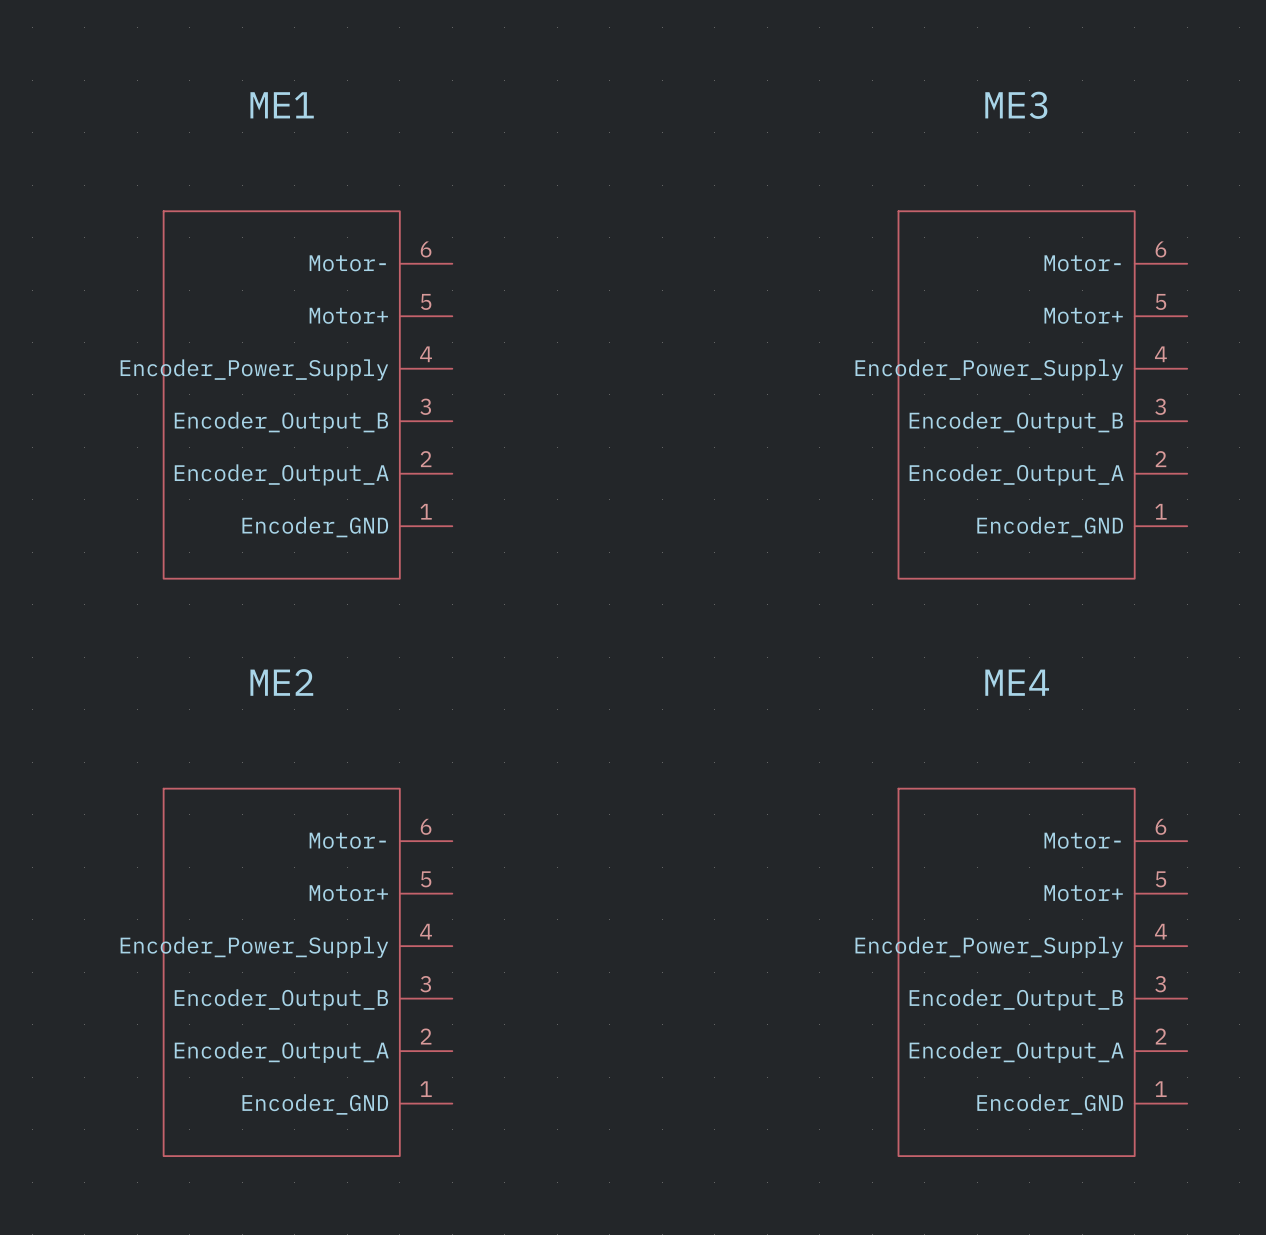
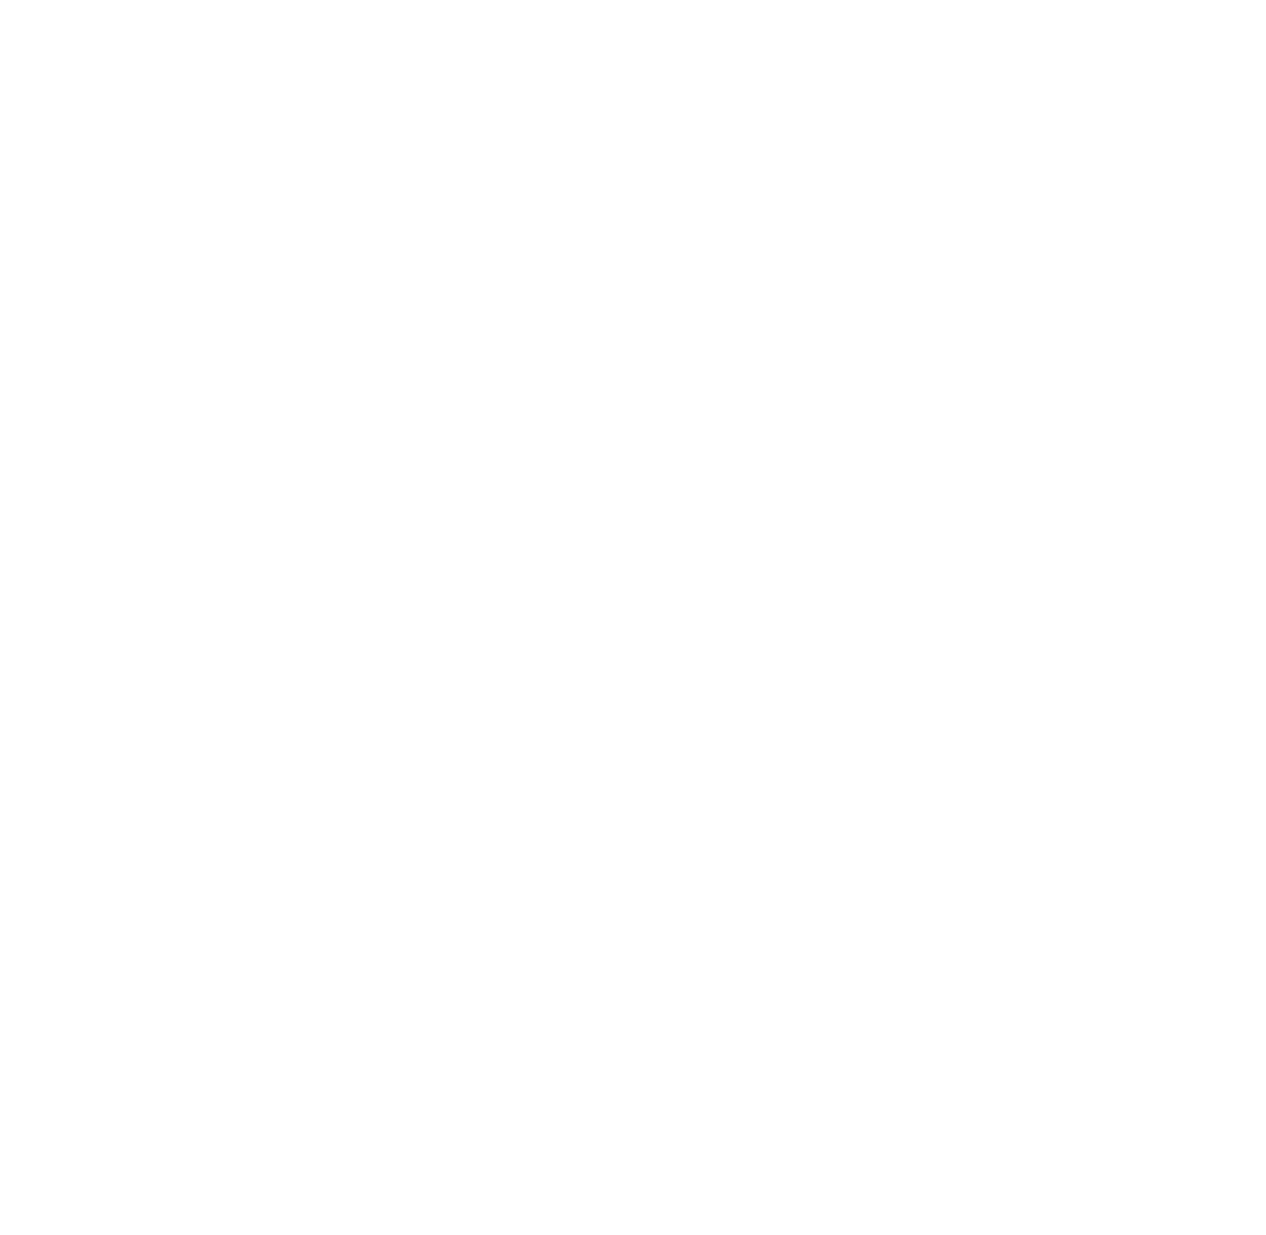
ME1: (307, 394) -> none
ME3: (1042, 394) -> none
ME2: (307, 972) -> none
ME4: (1042, 972) -> none

